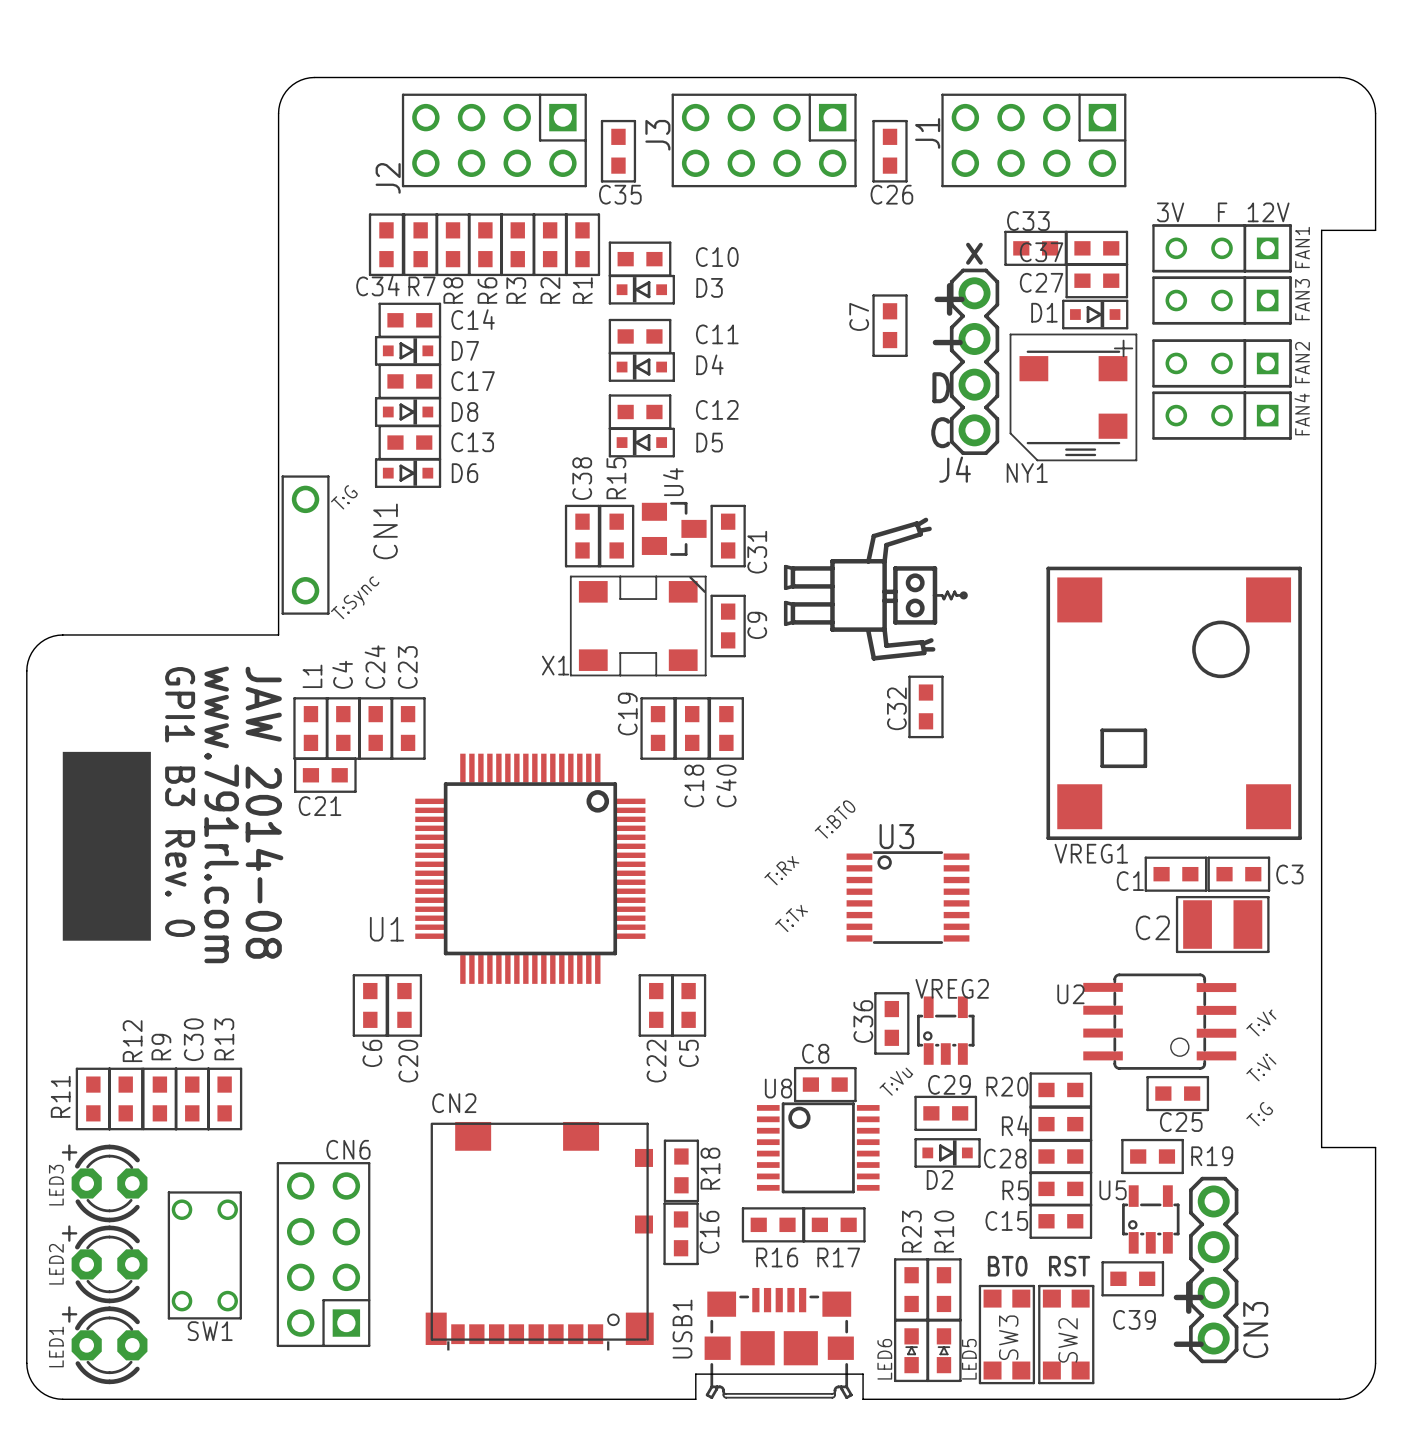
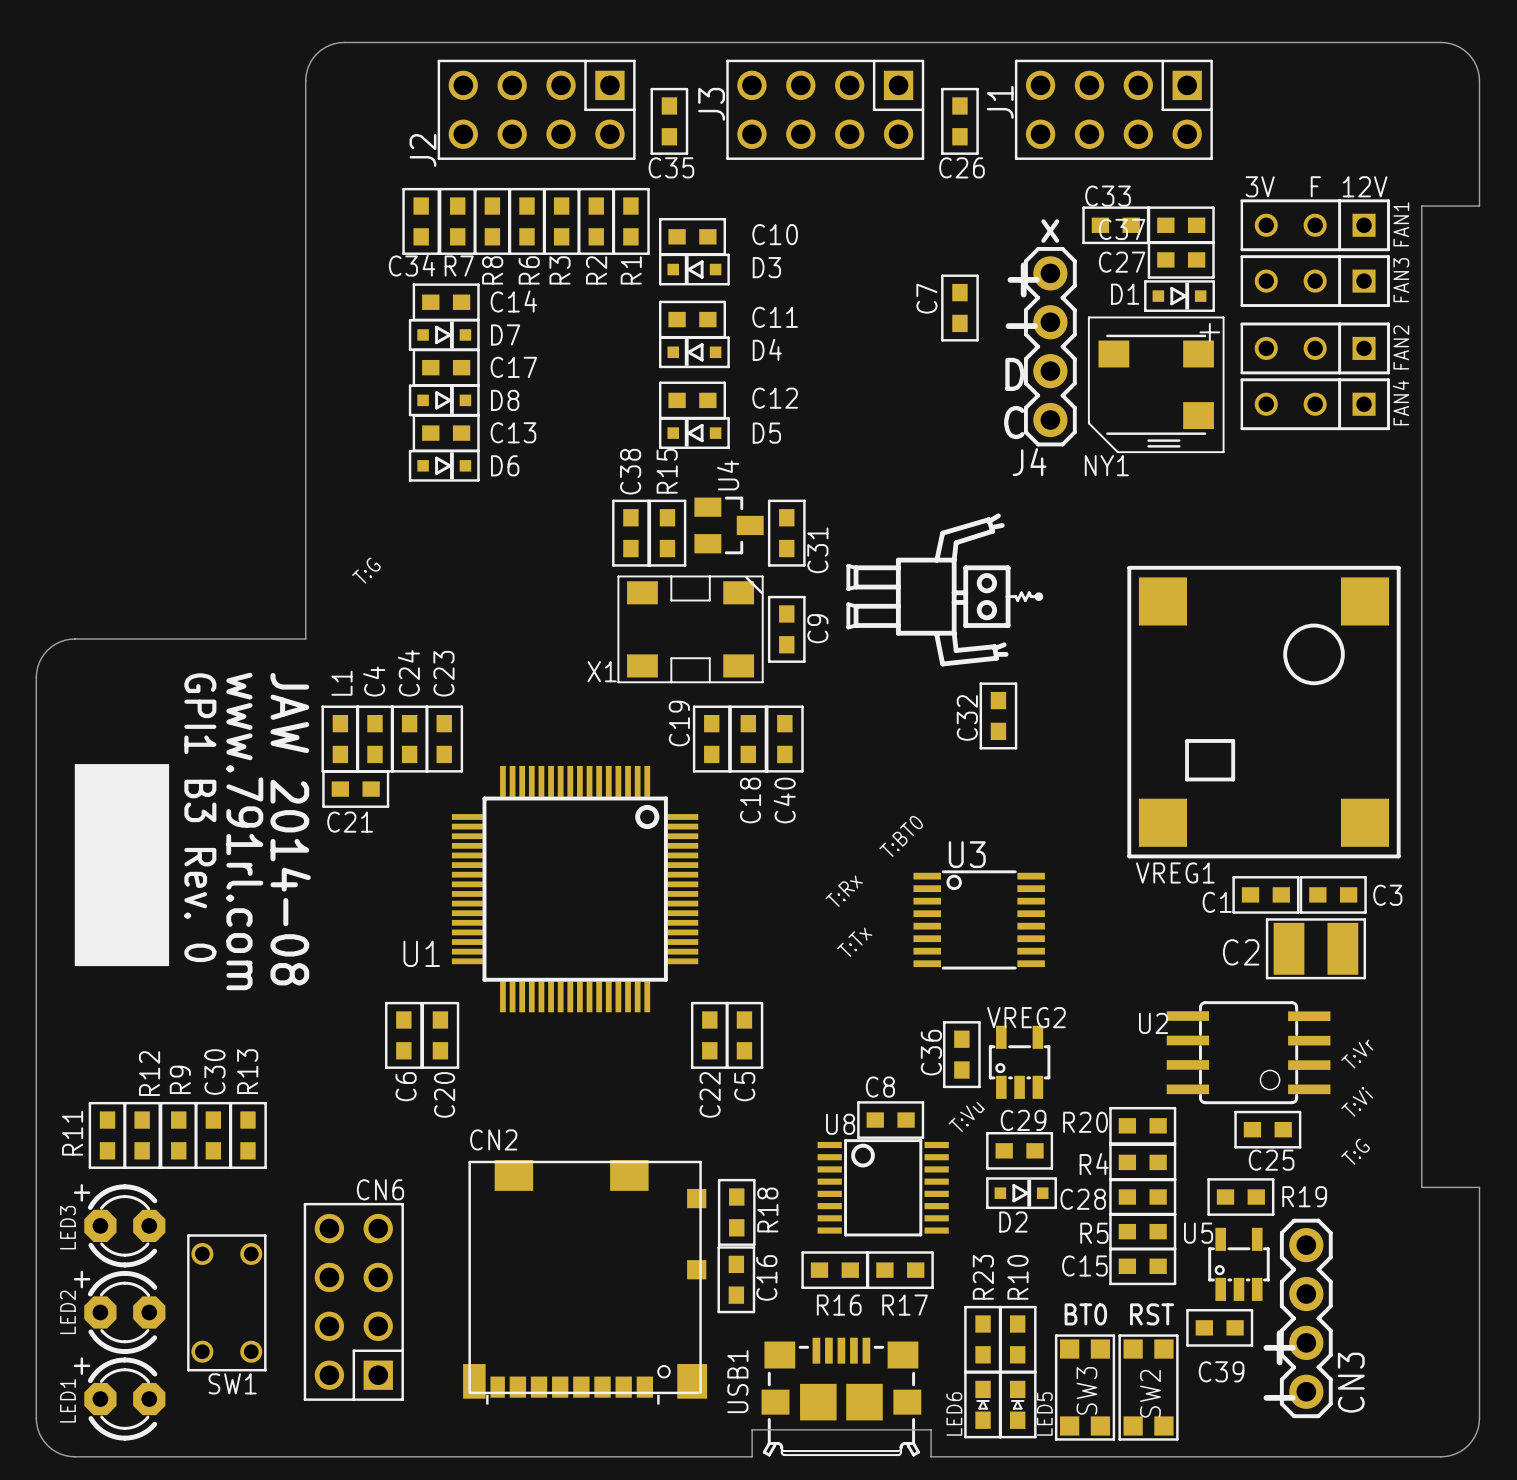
text position: T:G (344, 497) -> T:G (366, 570)
CN1: (305, 545) -> none
text: T:Sync (355, 597) -> none

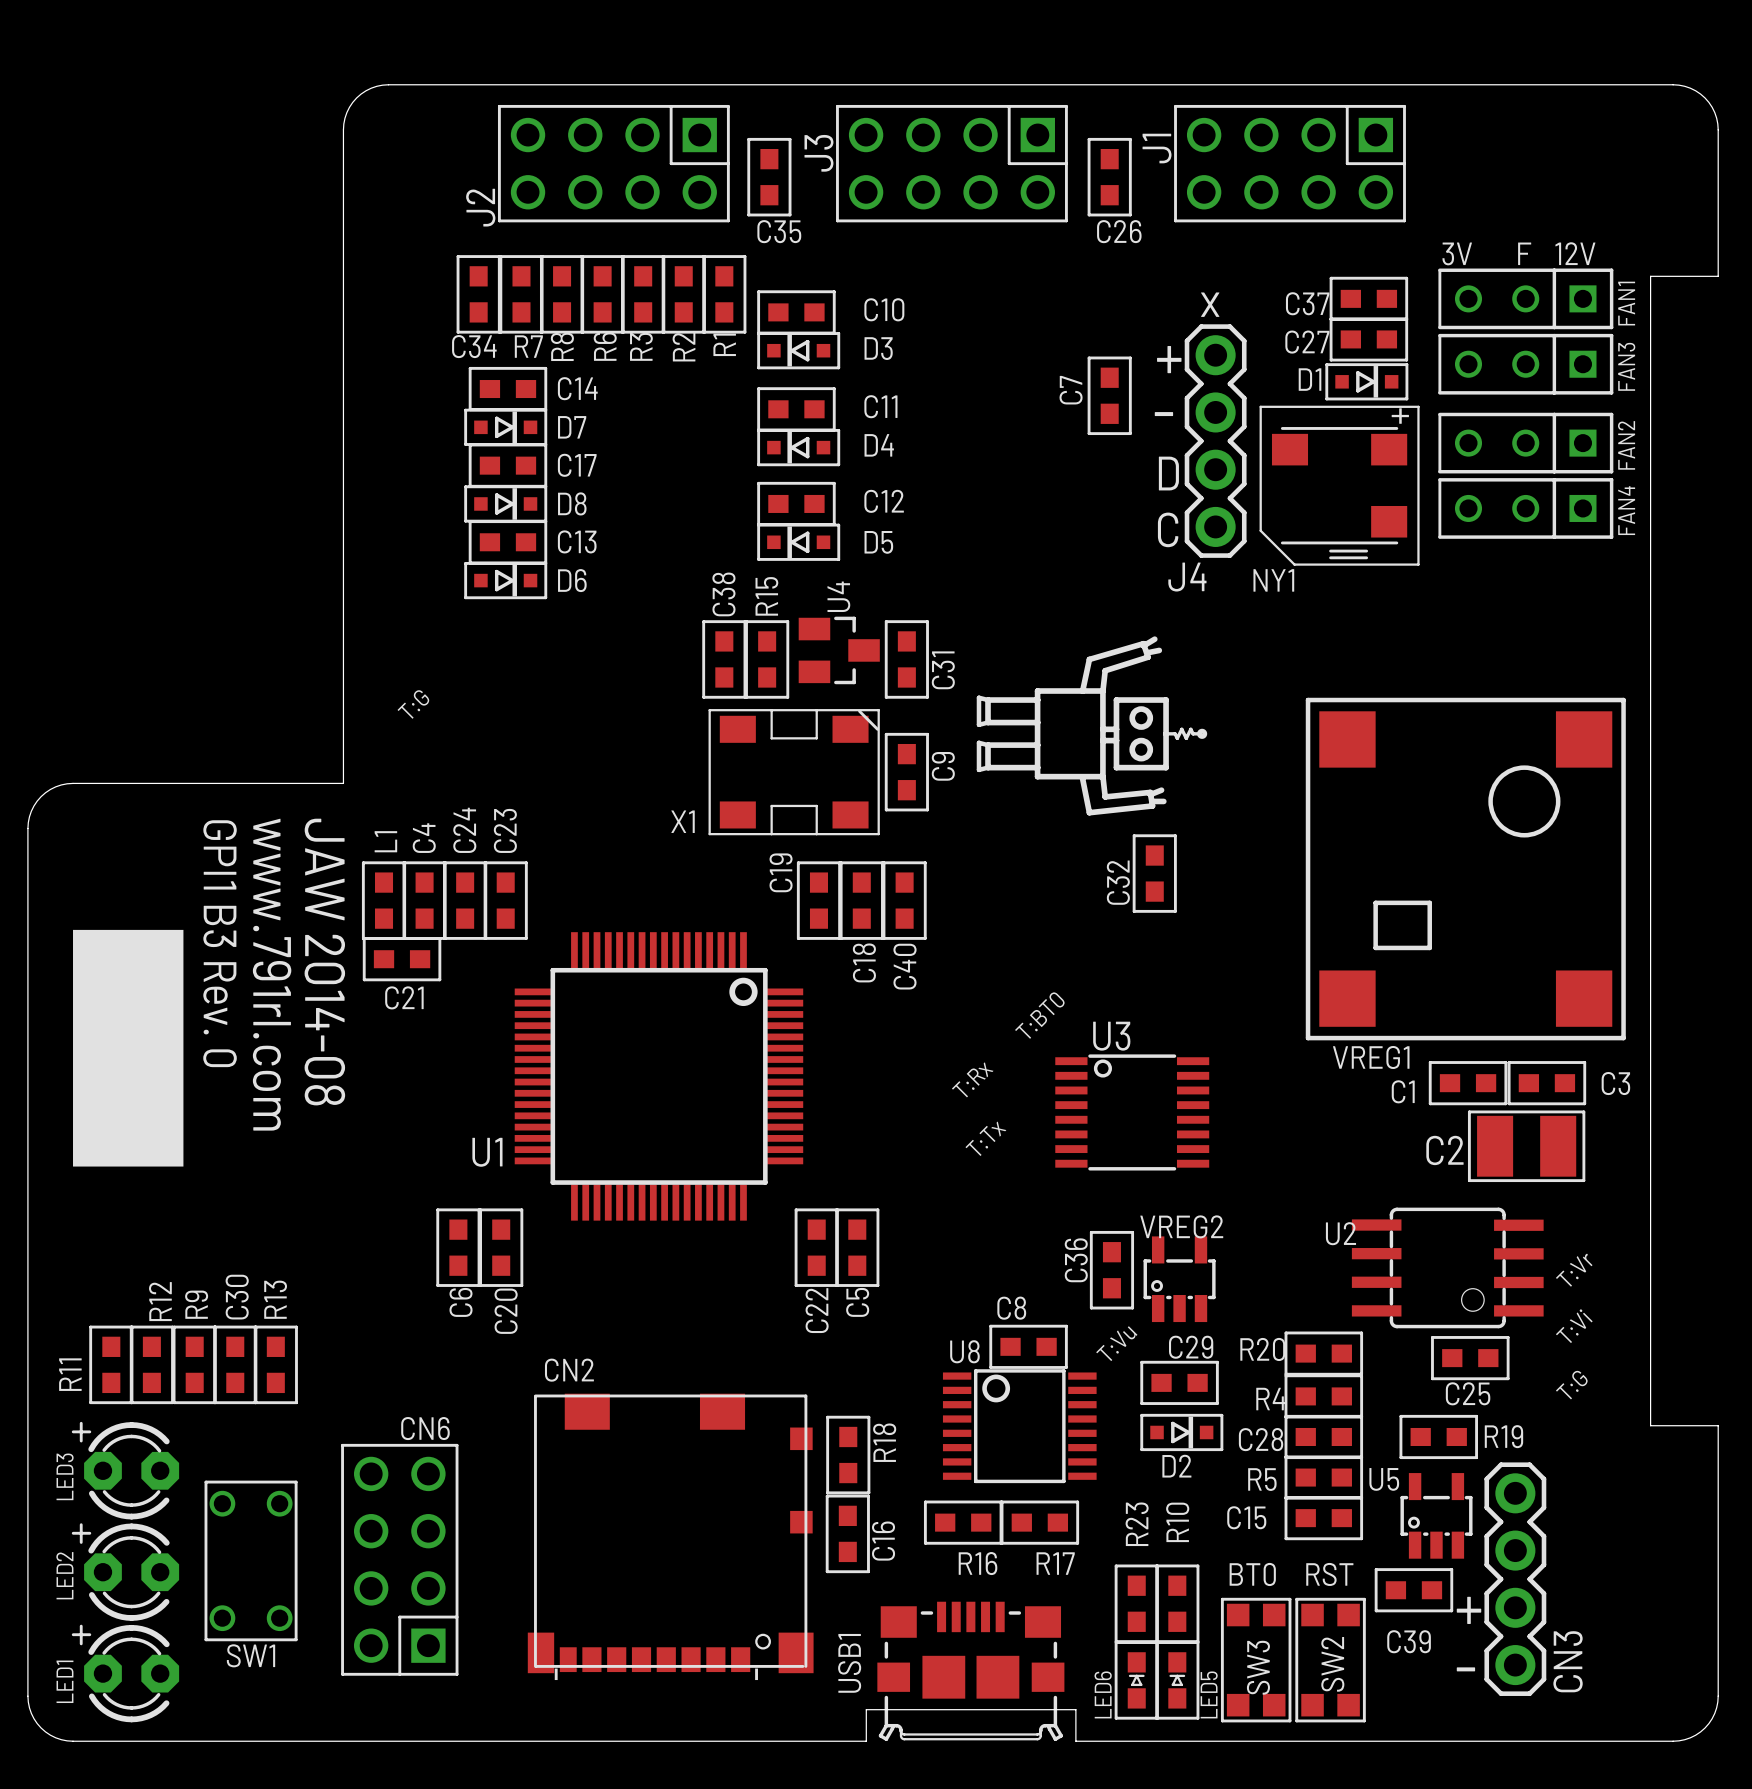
C33: (1115, 225) -> none

